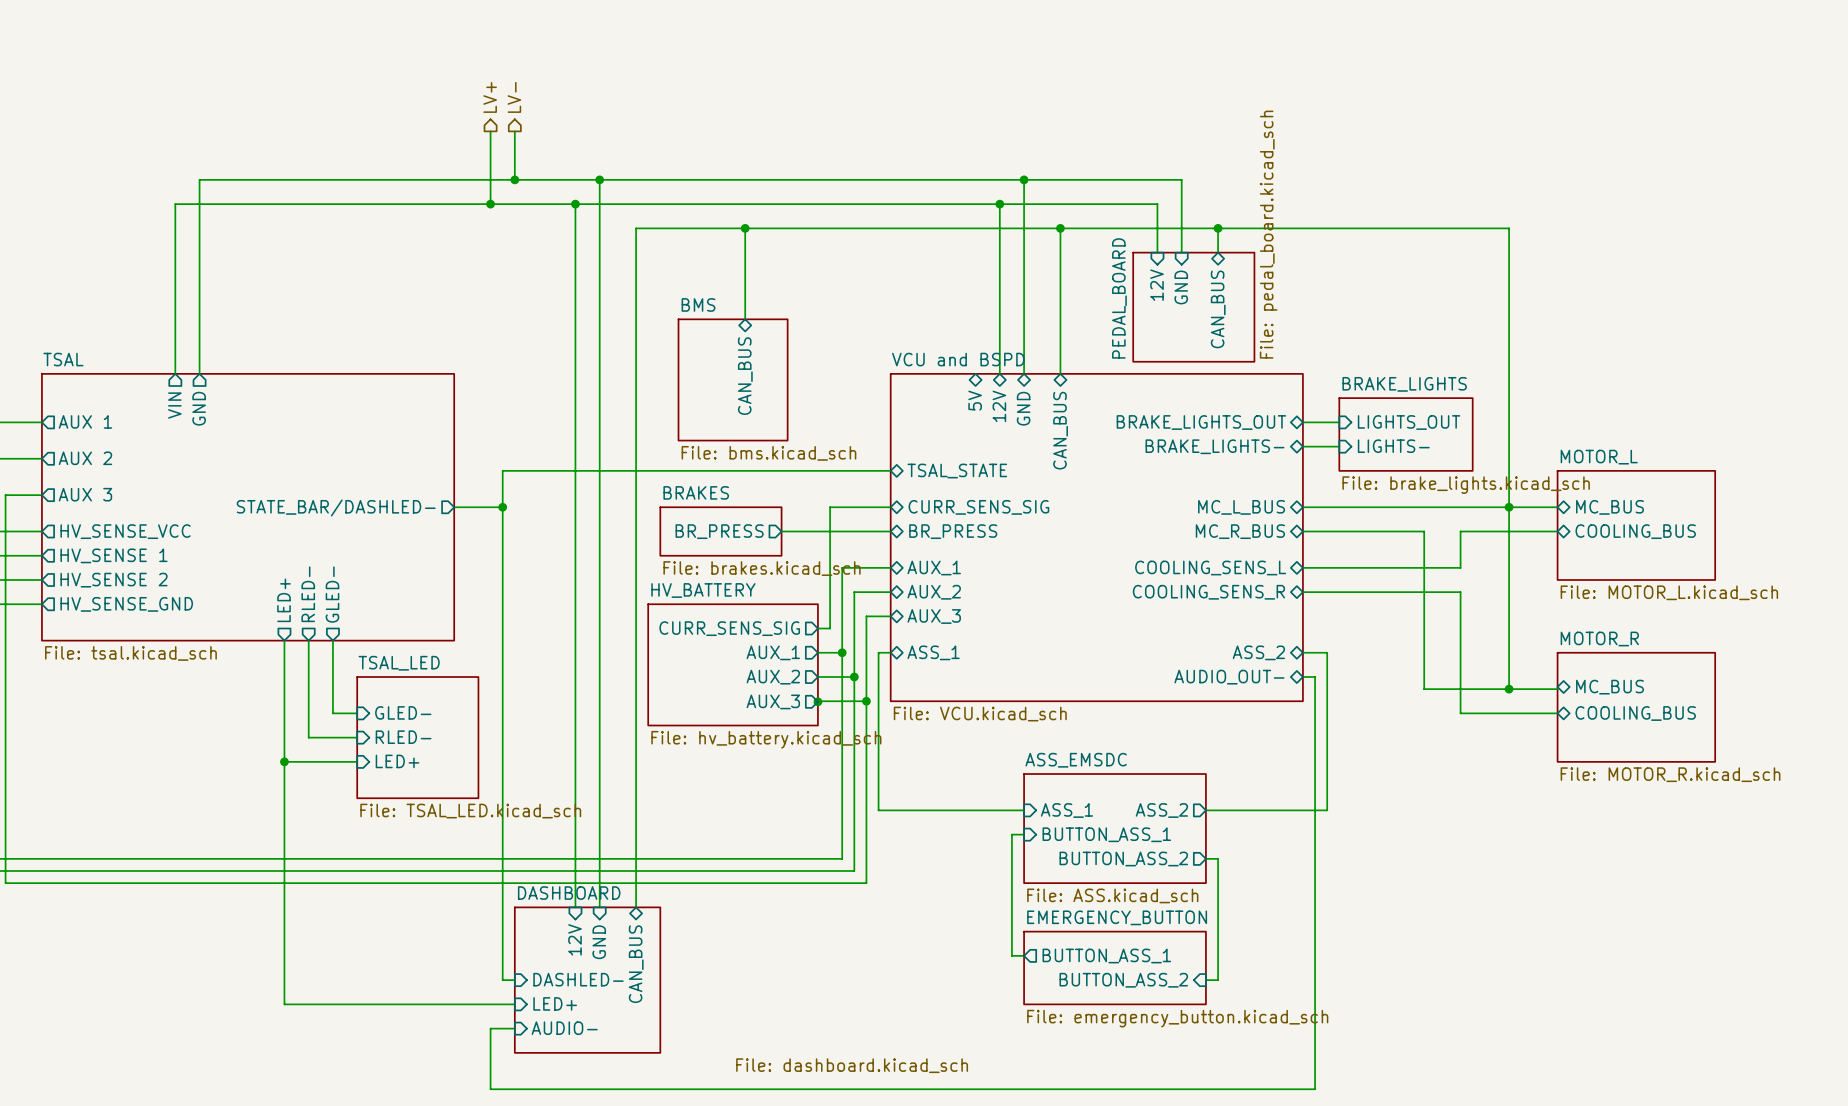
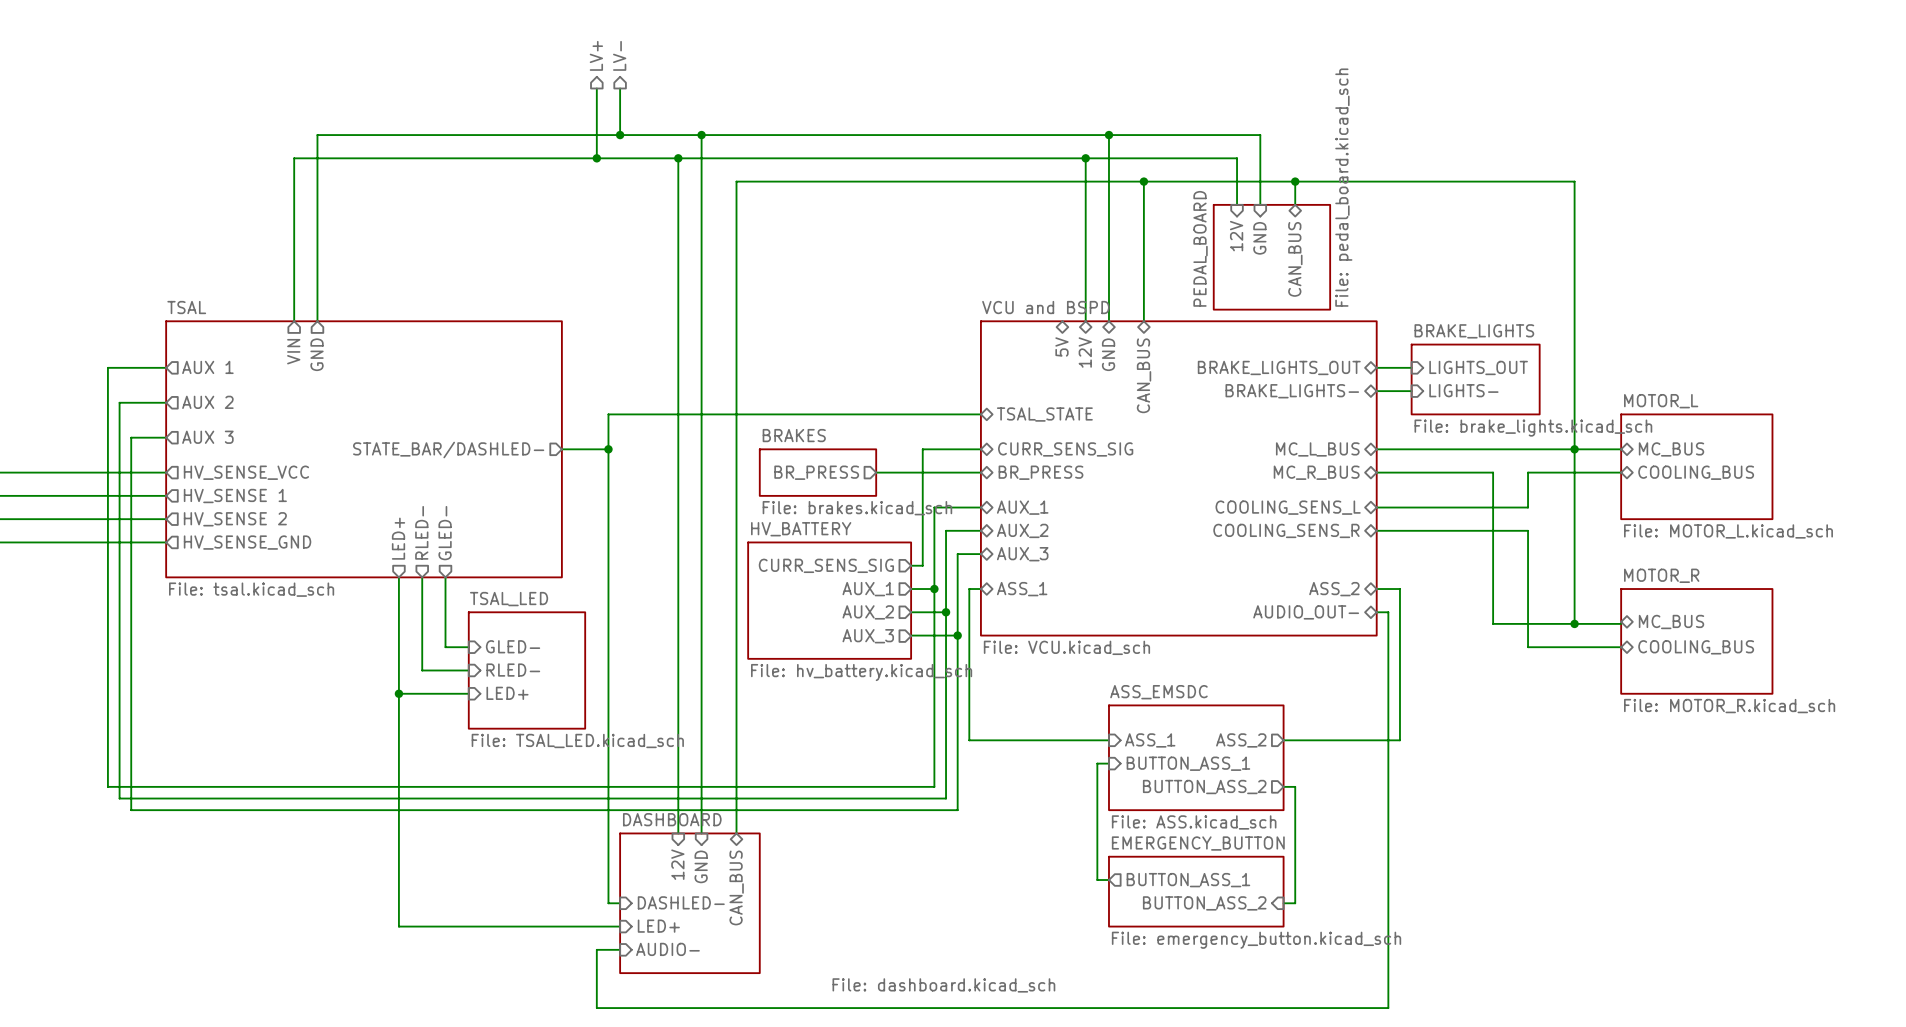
wire: (745, 228) (745, 319) -> none
junction: (745, 228) -> none
sheet pin: CAN_BUS (745, 376) -> none
sheet BMS: File: bms.kicad_sch (733, 379) -> none
junction: (817, 701) -> none

